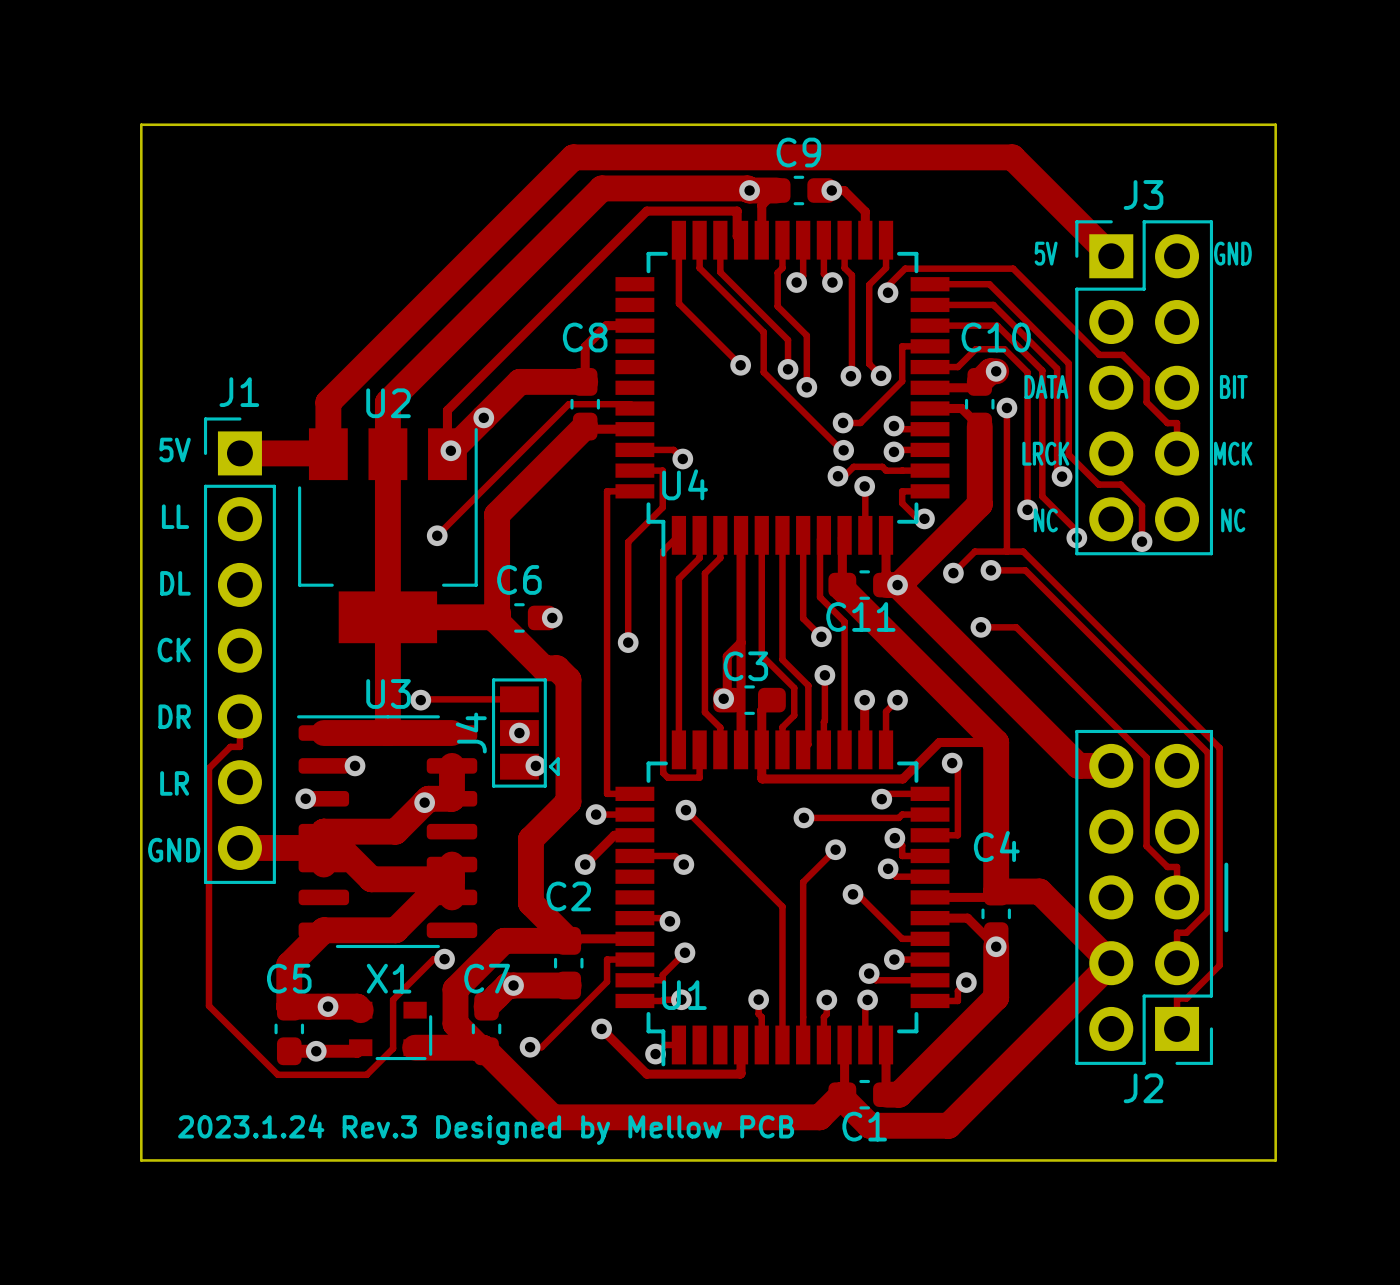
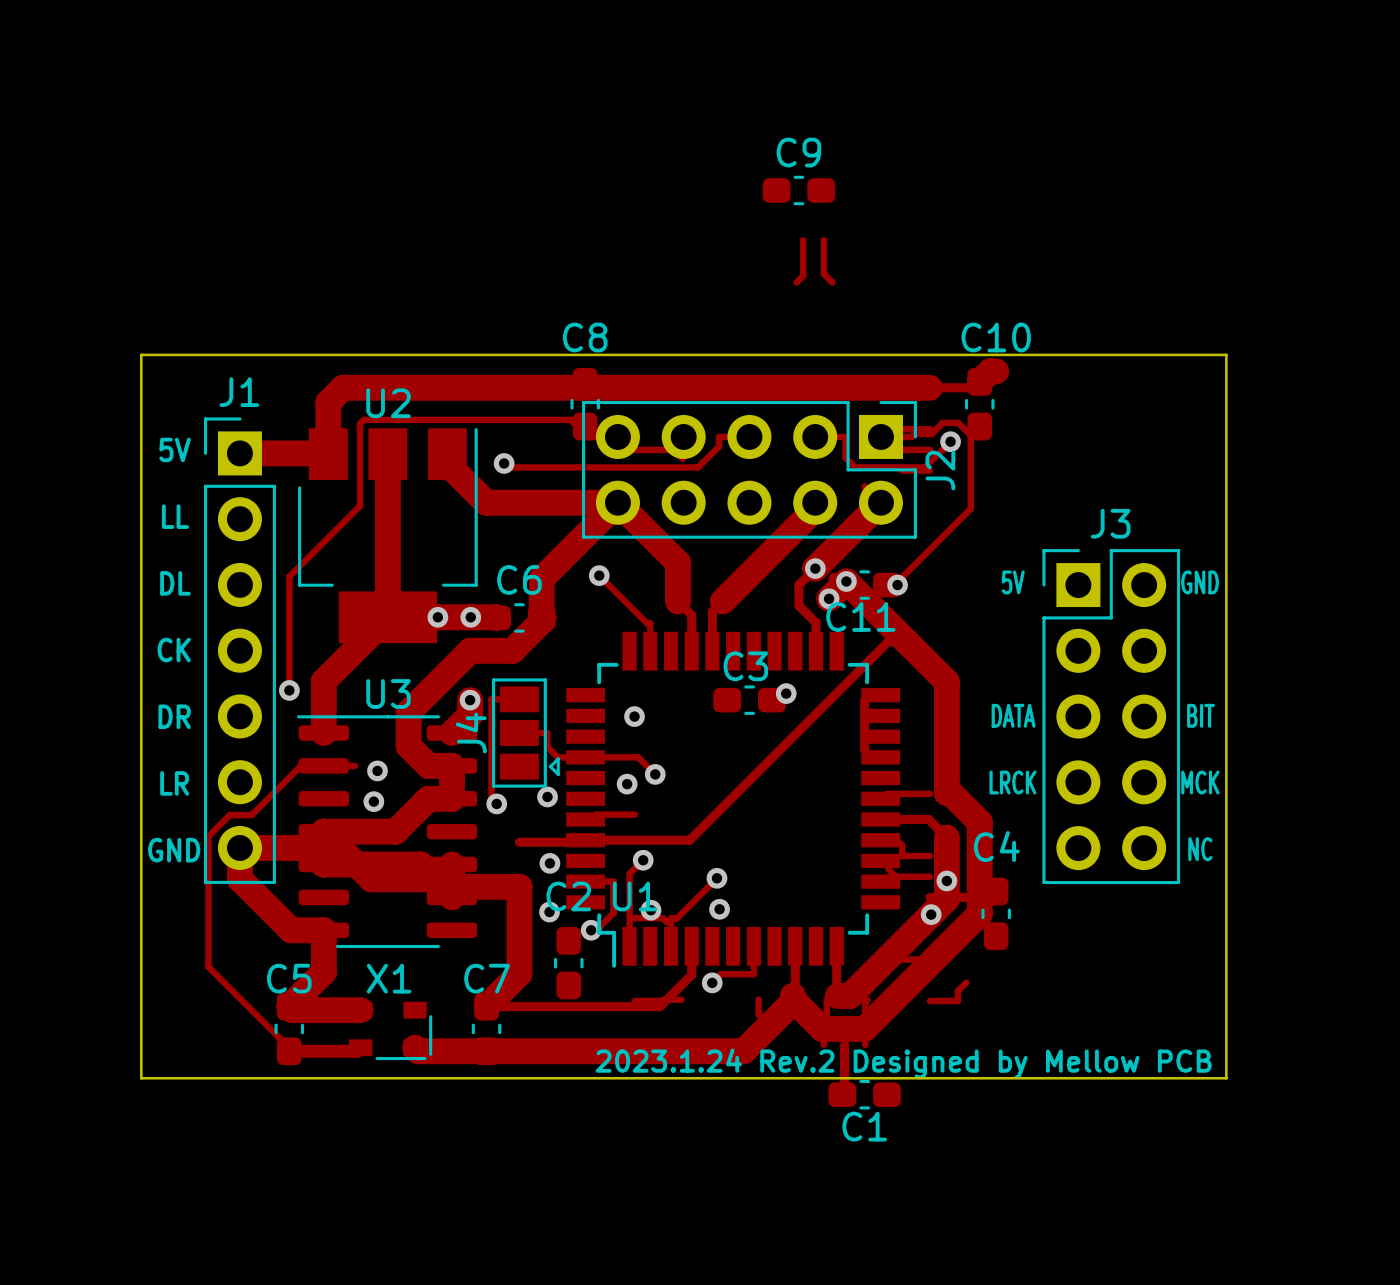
via: (749, 190) -> none
track: (821, 190) (844, 190) (865, 211) (865, 240) -> none
via: (831, 190) -> none
track: (678, 240) (678, 303) (740, 365) -> none
track: (699, 240) (699, 268) (763, 332) (763, 372) (843, 450) -> none
track: (720, 240) (720, 272) (788, 339) (788, 369) -> none
track: (741, 240) (737, 236) (737, 211) (646, 211) (447, 410) (447, 454) (519, 381) (585, 381) (585, 346) (606, 325) (634, 325) -> none
track: (761, 240) (761, 205) (776, 190) (749, 190) (747, 188) (601, 188) (387, 402) (387, 454) -> none
track: (782, 240) (782, 268) (777, 272) (777, 306) (806, 335) (806, 387) -> none
track: (844, 240) (844, 268) (851, 275) (850, 376) -> none
track: (886, 240) (886, 268) (869, 284) (869, 363) (881, 375) -> none
text position: 5V (1046, 253) -> 5V (1013, 582)
text position: GND (1232, 253) -> GND (1200, 582)
track: (1111, 256) (1012, 157) (573, 157) (342, 387) -> (930, 387) (342, 387)
via: (796, 282) -> none
via: (832, 282) -> none
track: (930, 284) (989, 284) (1068, 363) (1068, 454) (1098, 484) (1120, 484) (1142, 505) (1142, 541) -> none
track: (888, 292) (888, 285) (905, 268) (1013, 268) (1099, 354) (1122, 354) (1146, 379) (1146, 402) (1167, 423) (1177, 423) (1177, 453) -> none
via: (888, 292) -> none
track: (930, 304) (993, 304) (1057, 368) (1057, 471) (1062, 476) -> none
track: (930, 325) (997, 325) (1042, 370) (1042, 496) (1076, 531) (1076, 537) -> none
track: (930, 346) (902, 346) (902, 381) (860, 422) (843, 422) -> none
board edge: (141, 354) (141, 124) (1275, 124) (1275, 1160) (141, 1160) (141, 1078) -> (141, 354) (1226, 354) (1226, 1078) (141, 1078)
via: (740, 365) -> none
track: (930, 367) (957, 367) (975, 349) (1004, 349) (1027, 372) (1027, 509) -> none
via: (788, 369) -> none
via: (996, 371) -> none
via: (881, 375) -> none
via: (850, 376) -> none
via: (806, 387) -> none
text position: DATA (1046, 387) -> DATA (1013, 715)
J3 position: (1144, 387) -> (1111, 716)
text position: BIT (1233, 387) -> BIT (1200, 715)
U4: (782, 388) -> none
track: (634, 408) (630, 404) (568, 404) (437, 535) -> none
track: (930, 408) (961, 408) (979, 426) (979, 504) (899, 585) (887, 585) -> none
track: (1006, 408) (1006, 551) -> none
via: (1006, 408) -> none
via: (483, 417) -> none
via: (843, 422) -> none
via: (894, 426) -> none
track: (634, 429) (587, 429) (585, 426) (497, 514) (497, 621) (543, 668) (556, 668) (568, 679) (568, 801) (530, 839) (530, 903) (568, 940) -> none
track: none -> (617, 436) (587, 436) (570, 419) (363, 419) (360, 423) (360, 505) (289, 576) (289, 690)
track: none -> (749, 436) (719, 436) (719, 446) (698, 467) (508, 467) (504, 463)
track: none -> (815, 436) (845, 436) (845, 457) (855, 467) (924, 467) (950, 441)
track: none -> (880, 436) (911, 436) (914, 434) (931, 434) (942, 422) (958, 422) (970, 435) (970, 508) (898, 580)
via: none -> (950, 441)
via: (450, 450) -> none
via: (843, 450) -> none
via: (893, 451) -> none
text position: LRCK (1045, 453) -> LRCK (1012, 782)
text position: MCK (1233, 453) -> MCK (1200, 782)
track: none -> (447, 454) (447, 463) (486, 502) (617, 502)
via: (682, 458) -> none
via: none -> (504, 463)
track: (634, 470) (662, 470) (662, 507) (628, 542) (628, 642) -> none
track: (902, 470) (886, 470) (882, 466) (853, 466) (844, 476) (837, 476) -> none
via: (837, 476) -> none
via: (1062, 476) -> none
via: (864, 486) -> none
track: (634, 491) (607, 491) (607, 793) (634, 793) -> none
track: (930, 491) (902, 491) (902, 503) (917, 518) (924, 518) -> none
track: none -> (617, 502) (541, 578) (541, 621) (512, 650) (470, 650) (408, 712) (408, 746) (428, 765) (451, 765)
track: none -> (617, 502) (677, 562) (677, 601) (691, 615) (691, 651)
track: none -> (815, 502) (815, 508) (712, 611) (712, 651)
track: none -> (880, 502) (815, 568)
via: (1027, 509) -> none
via: (924, 518) -> none
text: NC (1045, 520) -> none
text: NC (1233, 520) -> none
via: (437, 535) -> none
track: (678, 535) (663, 551) (663, 773) (667, 777) (699, 777) (699, 749) -> none
track: (699, 535) (699, 558) (678, 578) (678, 749) -> none
track: (720, 535) (720, 558) (704, 573) (704, 712) (720, 727) (720, 749) -> none
track: (741, 535) (741, 749) -> none
track: (761, 535) (761, 655) (794, 687) (794, 715) (782, 727) (782, 749) -> none
track: (782, 535) (782, 659) (808, 685) (808, 744) (803, 749) -> none
track: (803, 535) (803, 618) (821, 636) -> none
track: (823, 535) (820, 539) (820, 597) (844, 621) (844, 749) -> none
track: (844, 535) (842, 537) (842, 588) (996, 742) -> none
track: (886, 535) (886, 573) (1078, 765) (1111, 765) -> none
via: (1076, 537) -> none
via: (1142, 541) -> none
track: none -> (815, 568) (798, 585) (798, 605) (816, 622) (816, 651)
via: none -> (815, 568)
track: (990, 570) (1025, 570) (1207, 752) (1207, 911) (1186, 932) (1177, 932) (1177, 963) -> none
via: (990, 570) -> none
track: (953, 573) (974, 551) (1023, 551) (1219, 747) (1219, 965) (1186, 998) (1177, 998) (1177, 1028) -> none
via: (953, 573) -> none
track: none -> (599, 575) (647, 623) (650, 623) (650, 651)
via: none -> (599, 575)
via: none -> (846, 581)
track: none -> (829, 598) (846, 581) (946, 681) (946, 792) (950, 792) (979, 822) (979, 913) (864, 1028) (822, 1028) (793, 999)
via: none -> (829, 598)
track: (387, 617) (387, 733) -> (387, 617) (323, 681) (323, 733)
via: none -> (437, 617)
via: none -> (470, 617)
via: (552, 617) -> none
track: (980, 627) (1016, 627) (1146, 757) (1146, 846) (1167, 866) (1177, 866) (1177, 897) -> none
via: (980, 627) -> none
via: (821, 636) -> none
track: none -> (906, 641) (888, 641) (689, 840) (519, 842)
via: (628, 642) -> none
track: (741, 642) (727, 656) (727, 700) -> none
track: (824, 675) (823, 749) -> none
via: (824, 675) -> none
via: none -> (289, 690)
via: none -> (786, 693)
via: (723, 698) -> none
track: (421, 699) (491, 699) -> (496, 803) (491, 798) (491, 699)
via: (420, 700) -> none
via: none -> (470, 700)
track: (771, 700) (761, 710) (762, 778) (902, 778) (939, 742) (996, 742) -> none
via: (864, 700) -> none
track: (897, 700) (886, 711) (886, 749) -> none
via: (897, 700) -> none
track: (239, 716) (239, 746) (230, 746) (208, 768) (208, 1005) (277, 1074) (366, 1074) (393, 1048) (393, 999) (433, 959) (444, 959) -> none
via: none -> (634, 716)
track: (323, 733) (451, 733) -> (470, 700) (470, 714) (451, 733)
track: none -> (519, 733) (547, 733) (547, 746) (557, 757) (638, 757) (655, 774)
via: (519, 733) -> none
track: (996, 742) (996, 891) (1039, 891) (1111, 963) (948, 1125) (869, 1125) (842, 1098) (842, 1094) (819, 1117) (552, 1117) (482, 1047) (415, 1047) -> none
track: (952, 763) (957, 768) (957, 835) (930, 835) -> none
via: (952, 763) -> none
track: none -> (323, 765) (300, 765) (251, 815) (229, 815) (208, 836) (208, 966) (289, 1047)
via: (355, 765) -> none
via: (535, 765) -> none
via: none -> (377, 770)
via: none -> (655, 774)
via: none -> (627, 784)
via: none -> (547, 796)
via: (305, 798) -> none
via: (881, 799) -> none
via: none -> (373, 801)
via: (424, 802) -> none
via: none -> (496, 803)
track: (685, 810) (782, 906) (782, 1044) -> none
via: (685, 810) -> none
via: (596, 814) -> none
track: (930, 814) (902, 814) (898, 817) (803, 817) -> none
via: (803, 817) -> none
track: none -> (880, 819) (928, 819) (946, 837)
track: (634, 835) (614, 835) (585, 864) -> none
track: none -> (946, 837) (946, 898) (849, 996) (836, 995) (836, 946)
via: (894, 838) -> none
track: none -> (239, 847) (239, 879) (291, 930) (323, 930) (323, 972) (289, 1006)
track: none -> (307, 847) (323, 864) (420, 864) (443, 886) (519, 886) (519, 973) (486, 1006) (659, 1006) (691, 974) (691, 946)
track: (835, 849) (803, 882) (803, 1044) -> none
via: (835, 849) -> none
text: none -> NC (1200, 849)
track: (634, 856) (675, 856) (683, 864) -> none
track: none -> (643, 860) (629, 873) (629, 946)
via: none -> (643, 860)
via: none -> (549, 863)
via: (585, 864) -> none
via: (683, 864) -> none
line: (1226, 864) (1226, 930) -> none
via: (888, 868) -> none
track: none -> (716, 878) (676, 918) (671, 918) (671, 946)
via: none -> (716, 878)
track: (446, 879) (395, 930) (323, 930) (289, 964) (289, 1006) (357, 1006) (360, 1010) -> (289, 1006) (292, 1010) (360, 1010)
via: none -> (946, 880)
track: none -> (585, 881) (613, 881) (613, 913) (596, 930) (591, 930)
track: (853, 894) (857, 894) (902, 938) (930, 938) -> none
via: (853, 894) -> none
J2 rotation: 0° (1144, 897) -> 90° counterclockwise (749, 469)
J2 position: (1144, 897) -> (749, 469)
U1 position: (782, 898) -> (733, 799)
via: none -> (719, 909)
via: none -> (549, 912)
via: none -> (931, 914)
track: (930, 918) (967, 918) (990, 941) -> none
via position: (669, 921) -> (651, 910)
via: none -> (591, 930)
track: (634, 938) (570, 938) (568, 940) -> none
track: (568, 940) (504, 940) (455, 989) (455, 1023) (482, 1051) -> (415, 1047) (418, 1051) (482, 1051)
track: (990, 941) (996, 946) (996, 997) (899, 1094) (886, 1093) (886, 1044) -> none
track: none -> (753, 946) (753, 974) (720, 974) (712, 982)
track: none -> (795, 946) (795, 993) (793, 996) (793, 1001) (743, 1051) (486, 1051)
via: (996, 946) -> none
track: (684, 952) (662, 974) (662, 980) (634, 980) -> none
via: (684, 952) -> none
via: (444, 959) -> none
track: (634, 959) (607, 959) (607, 981) (541, 1047) (530, 1047) -> none
via: (894, 959) -> none
track: (869, 973) (875, 980) (930, 980) -> none
via: (869, 973) -> none
via: none -> (712, 982)
via: (966, 982) -> none
via: (513, 985) -> none
track: (568, 985) (507, 985) (486, 1006) -> none
via: (681, 999) -> none
via: (758, 999) -> none
via: (867, 999) -> none
via: (826, 1000) -> none
via: (328, 1006) -> none
track: (601, 1028) (646, 1074) (740, 1074) (741, 1044) -> none
via: (601, 1028) -> none
via: (530, 1047) -> none
via: (316, 1051) -> none
via: (655, 1054) -> none
text: none -> 2023.1.24 Rev.2 Designed by Mellow PCB (903, 1063)
text: 2023.1.24 Rev.3 Designed by Mellow PCB (486, 1129) -> none

